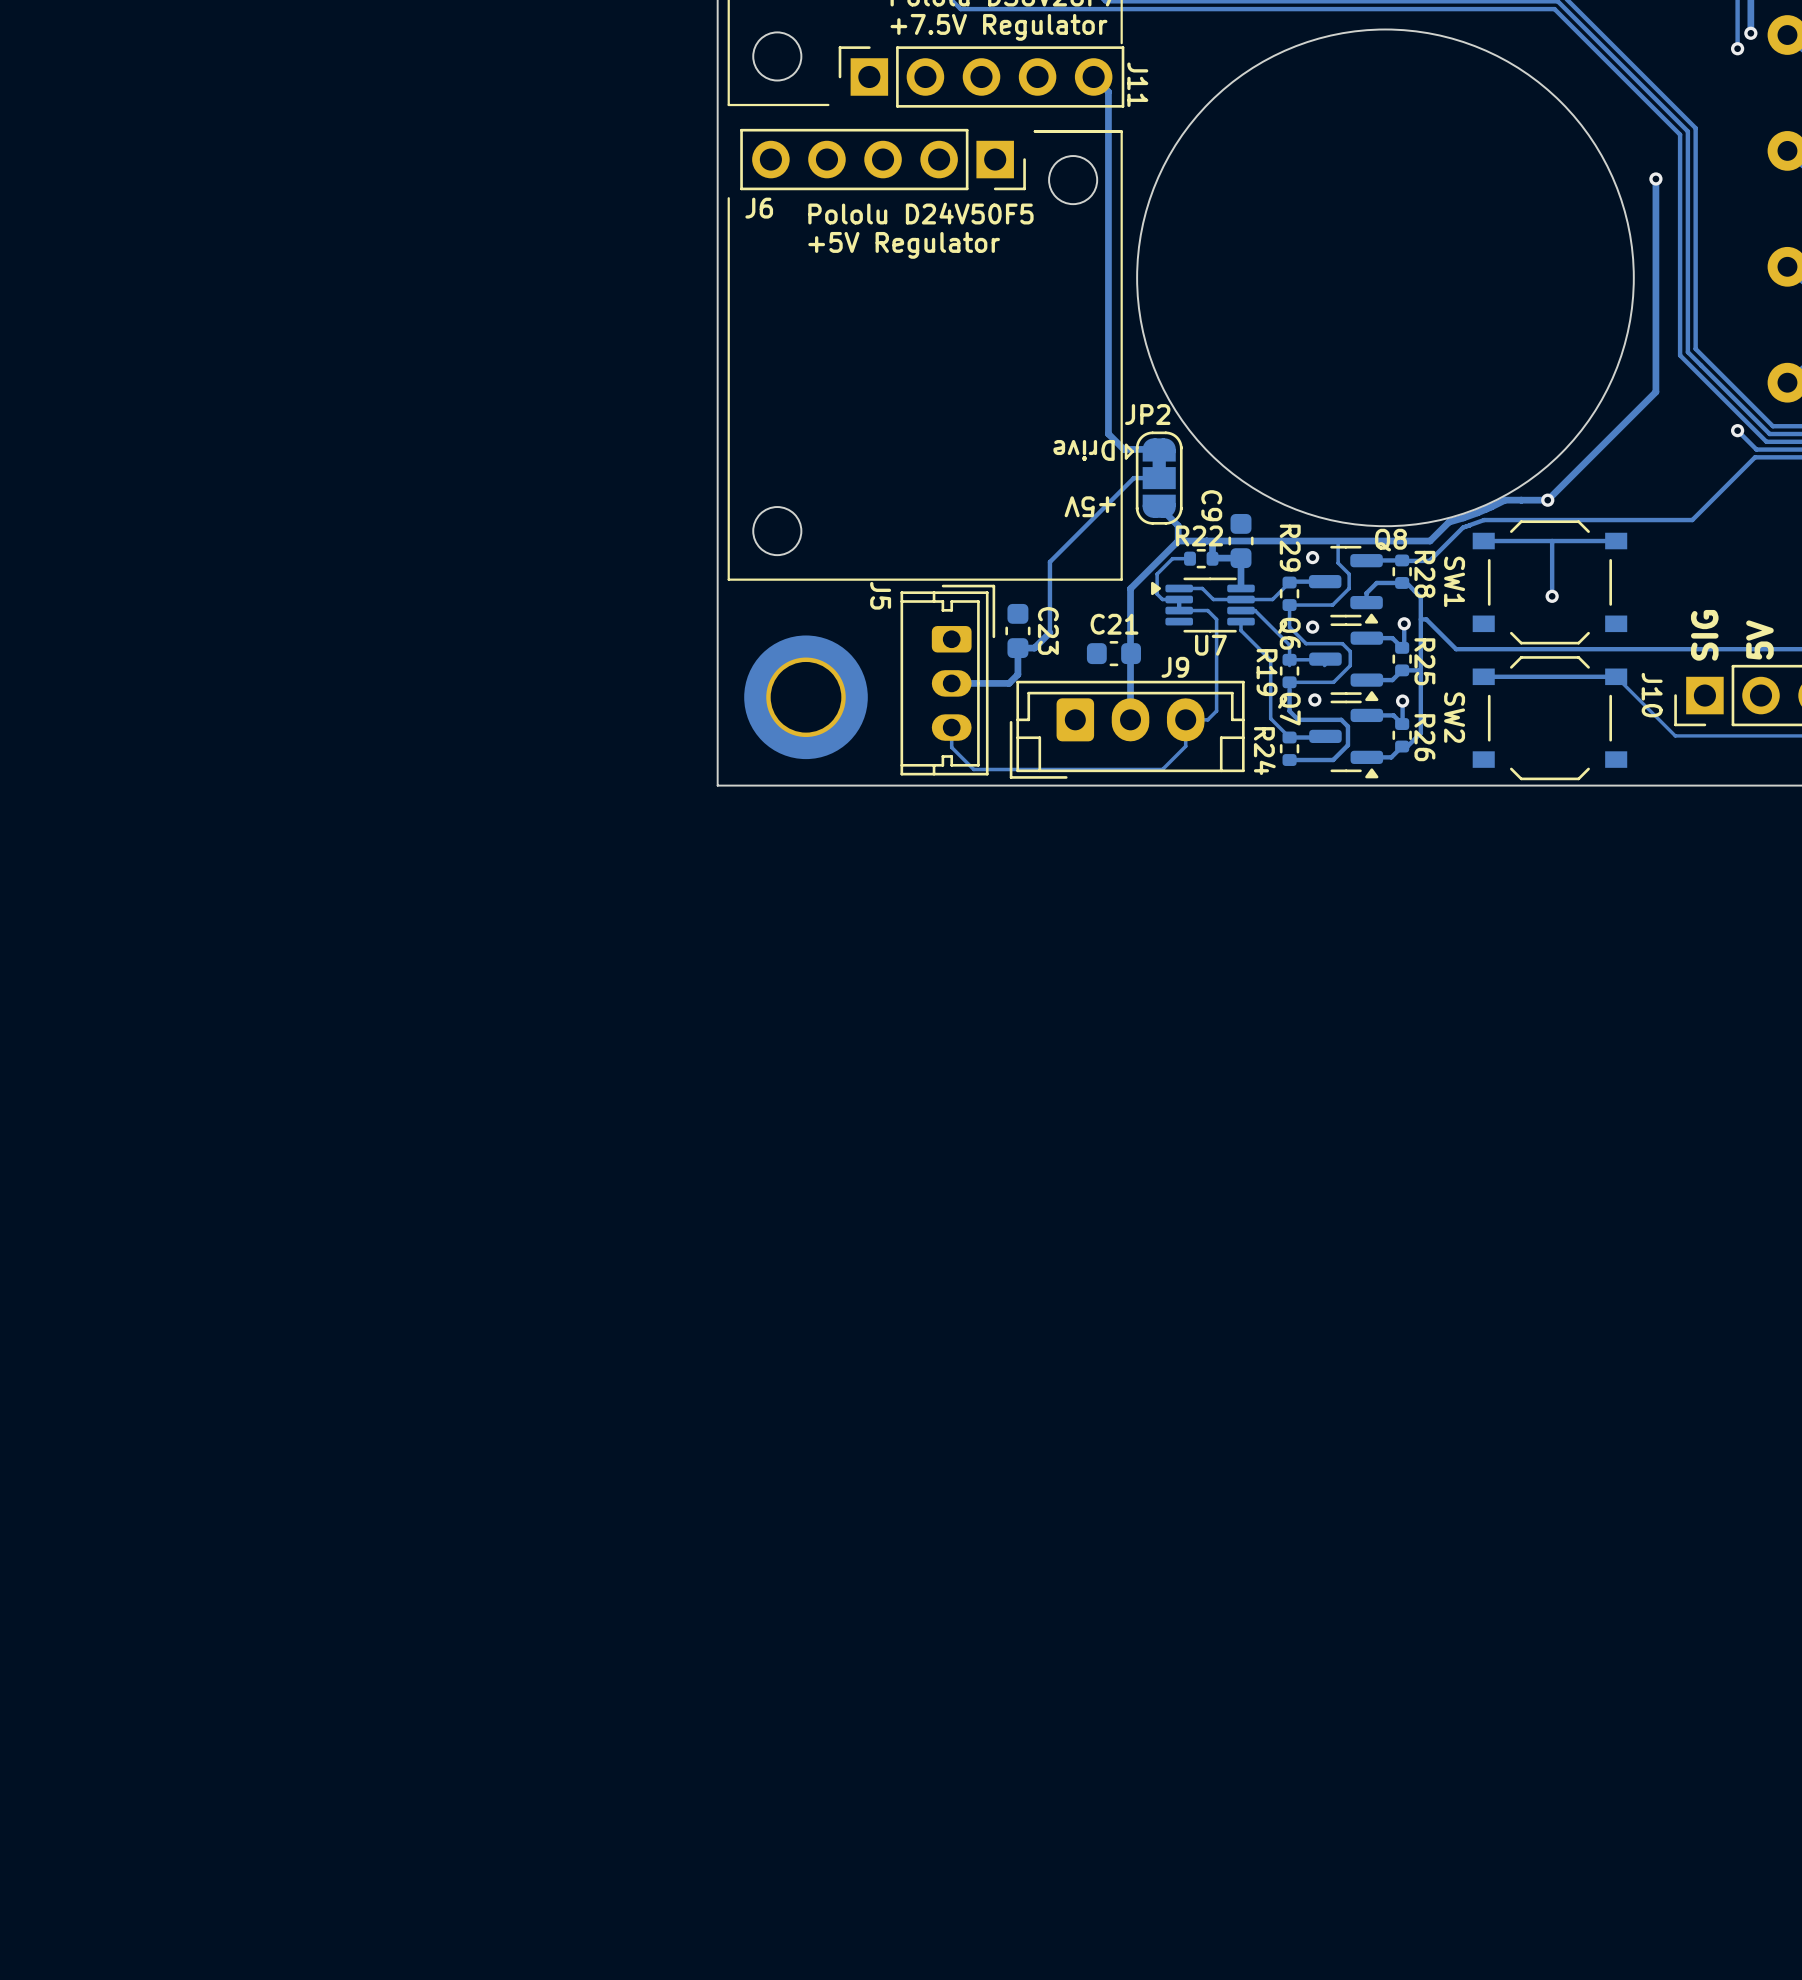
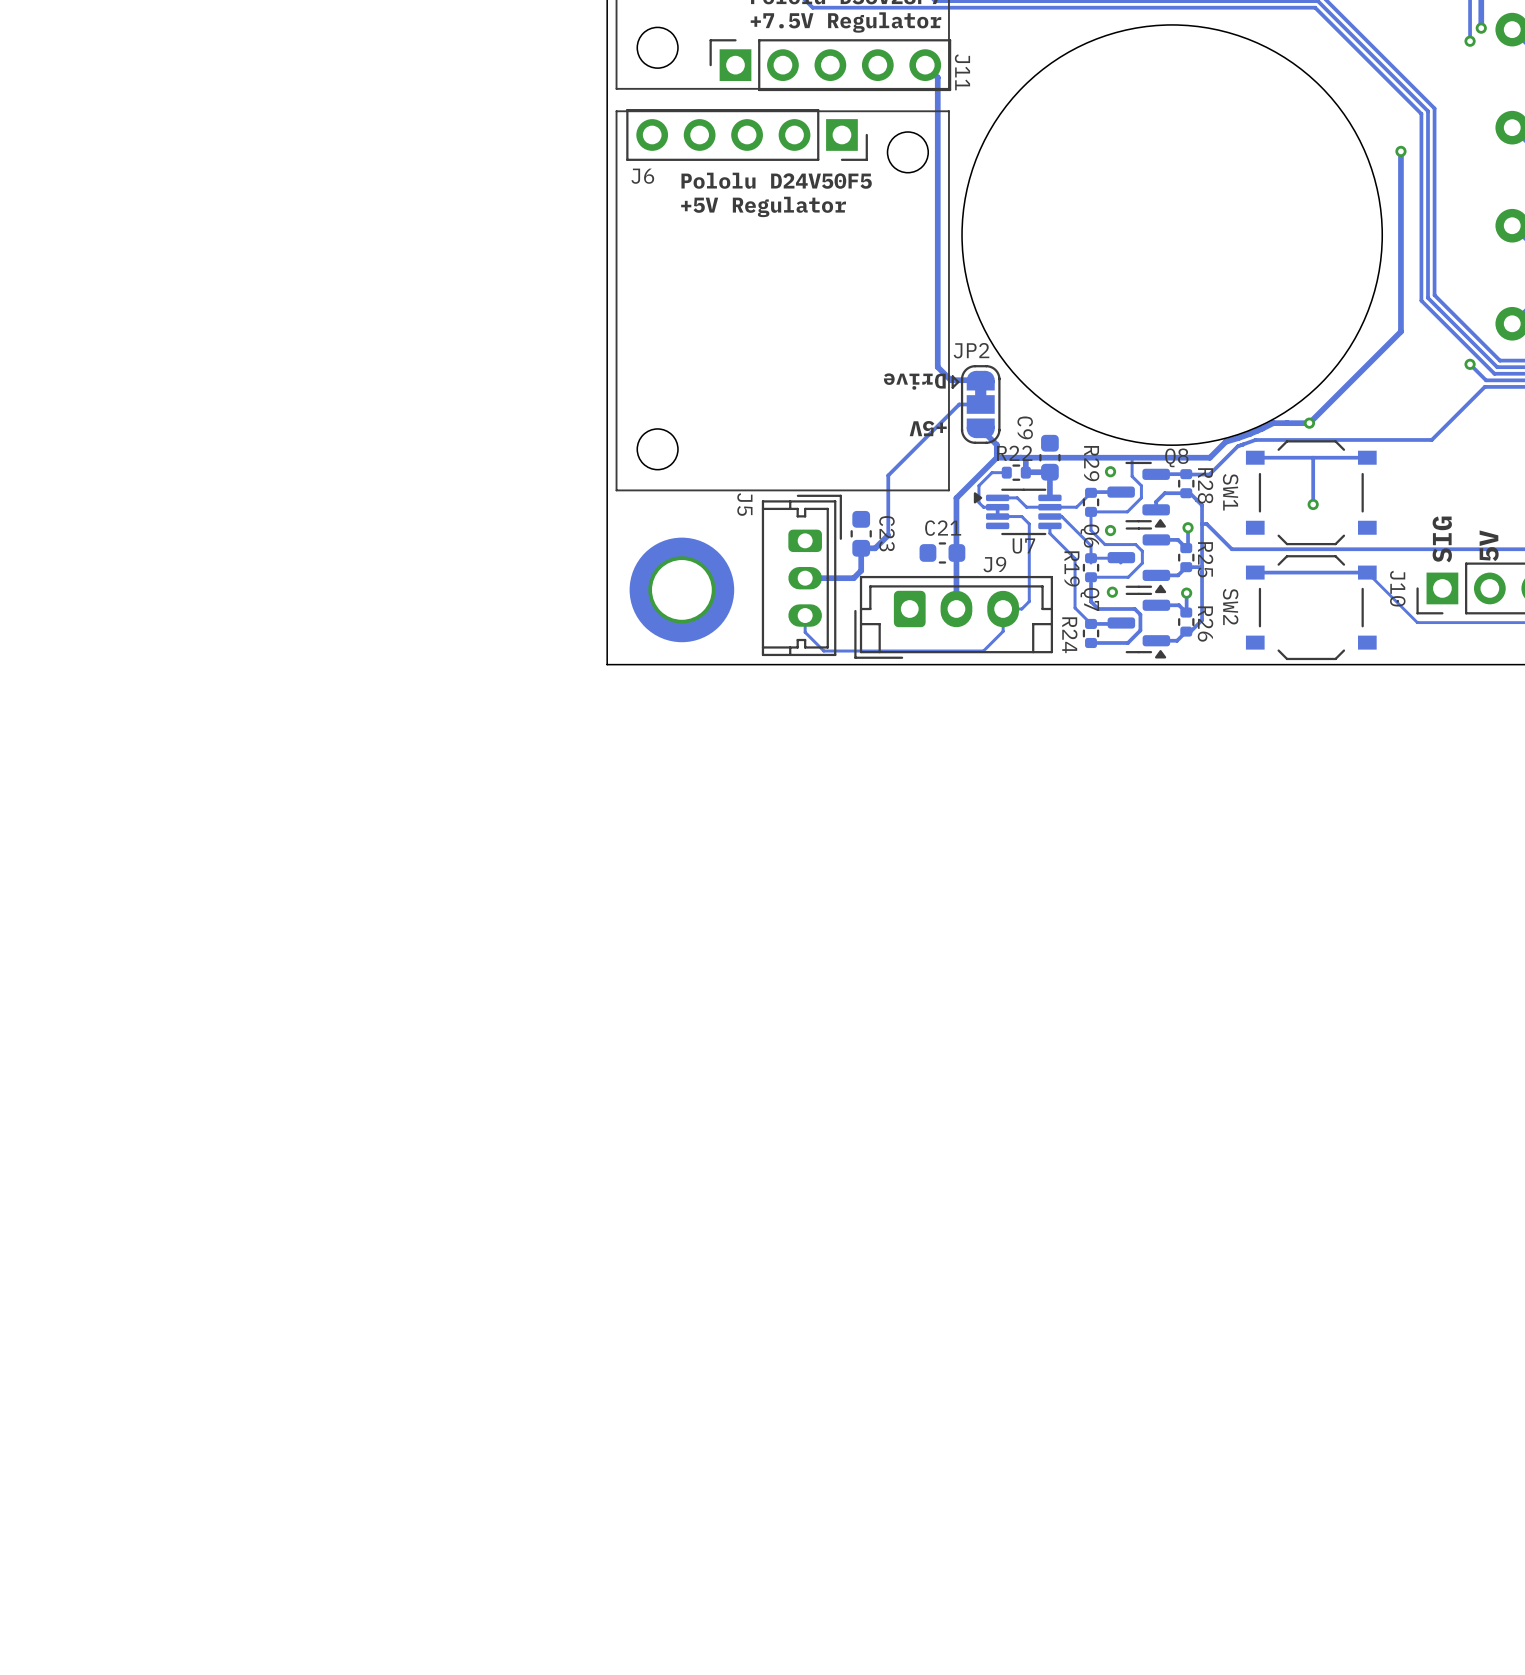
line: (828, 104) (728, 105) -> (948, 36) (948, 88) (616, 88)
line: (1121, 131) (1034, 131) -> (948, 111) (616, 111) (616, 167)

